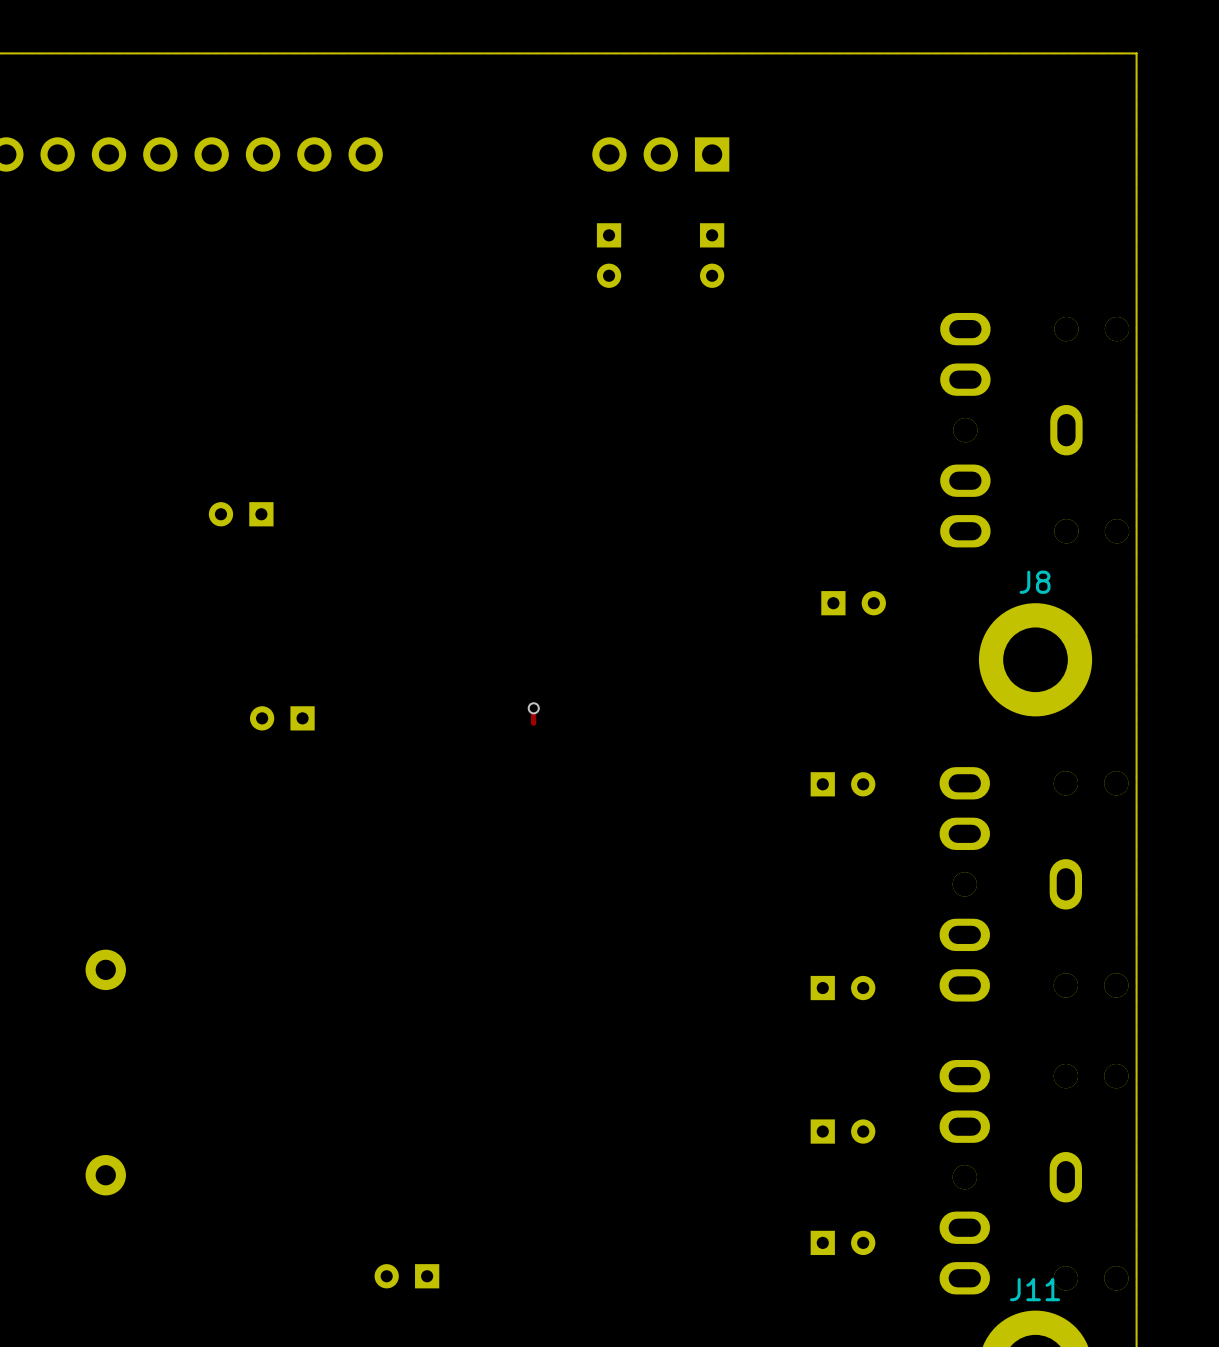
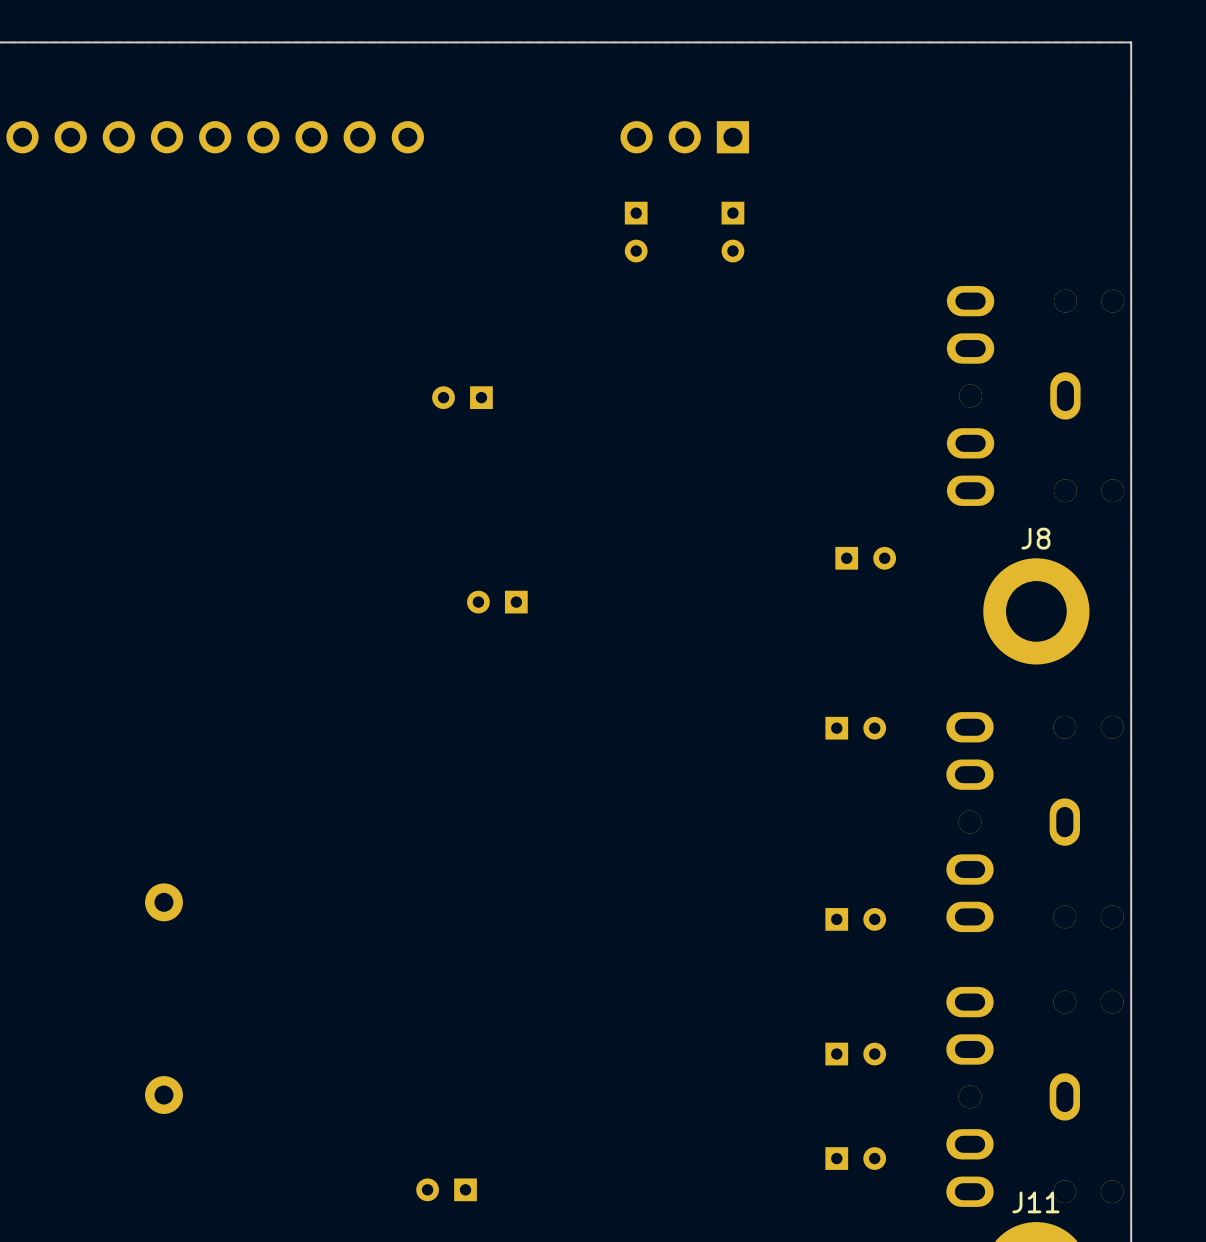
part: none -> (462, 397)
part: (241, 514) -> none
part: none -> (497, 602)
track: (533, 708) (533, 722) -> none
via: (533, 708) -> none
part: (282, 718) -> none

